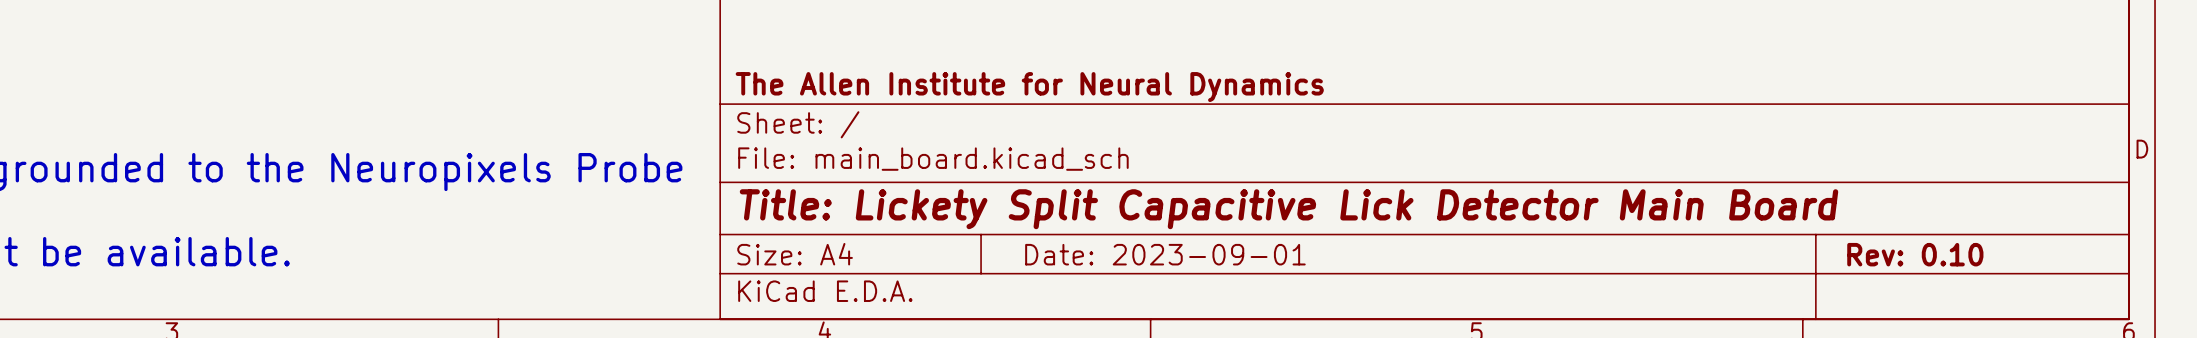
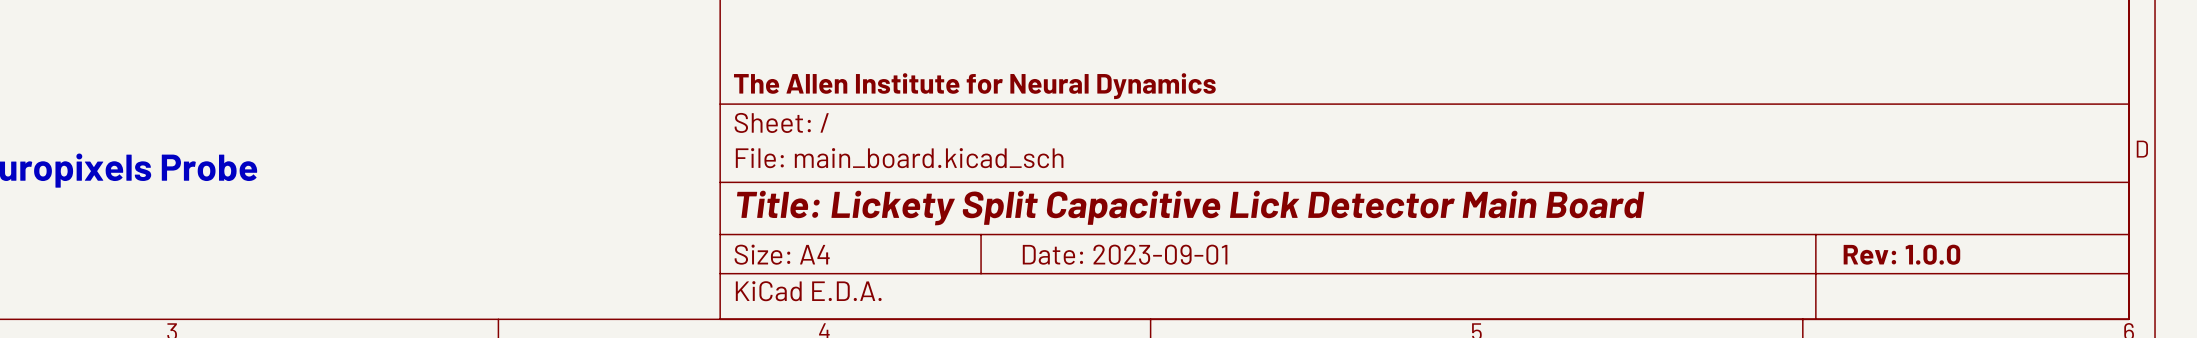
title block: Rev: 0.10 (1915, 254) -> Rev: 1.0.0 (1901, 254)

